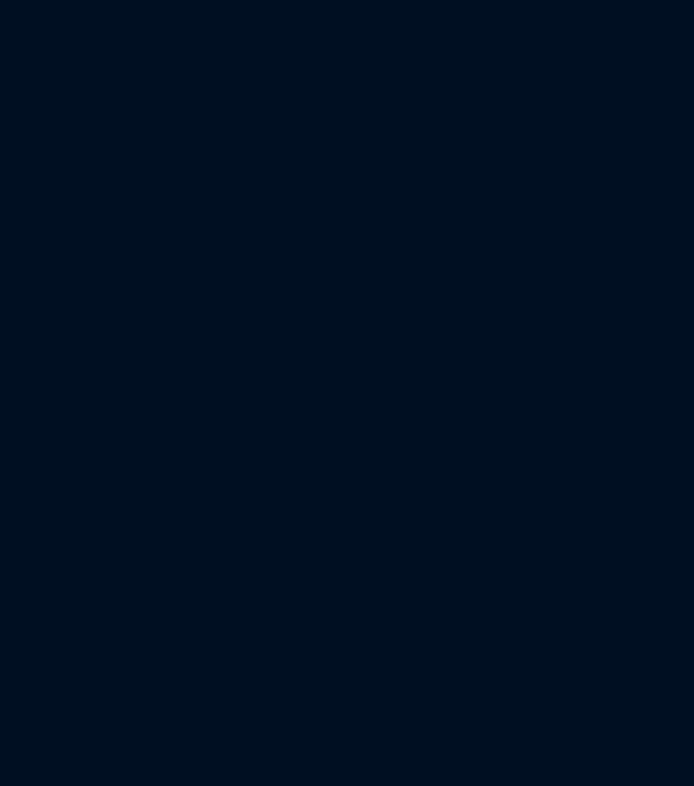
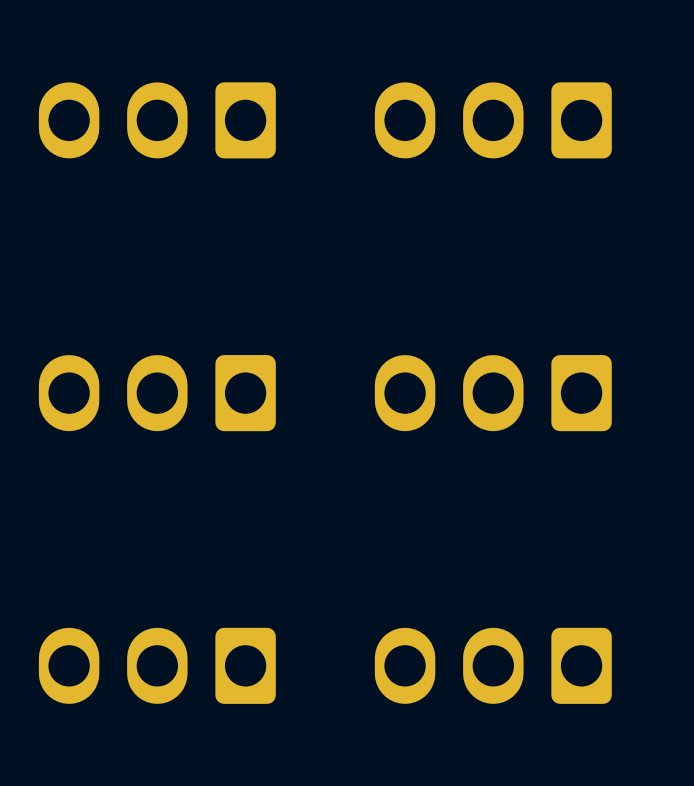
part: none -> (157, 120)
part: none -> (493, 120)
part: none -> (157, 393)
part: none -> (493, 393)
part: none -> (157, 665)
part: none -> (493, 665)

